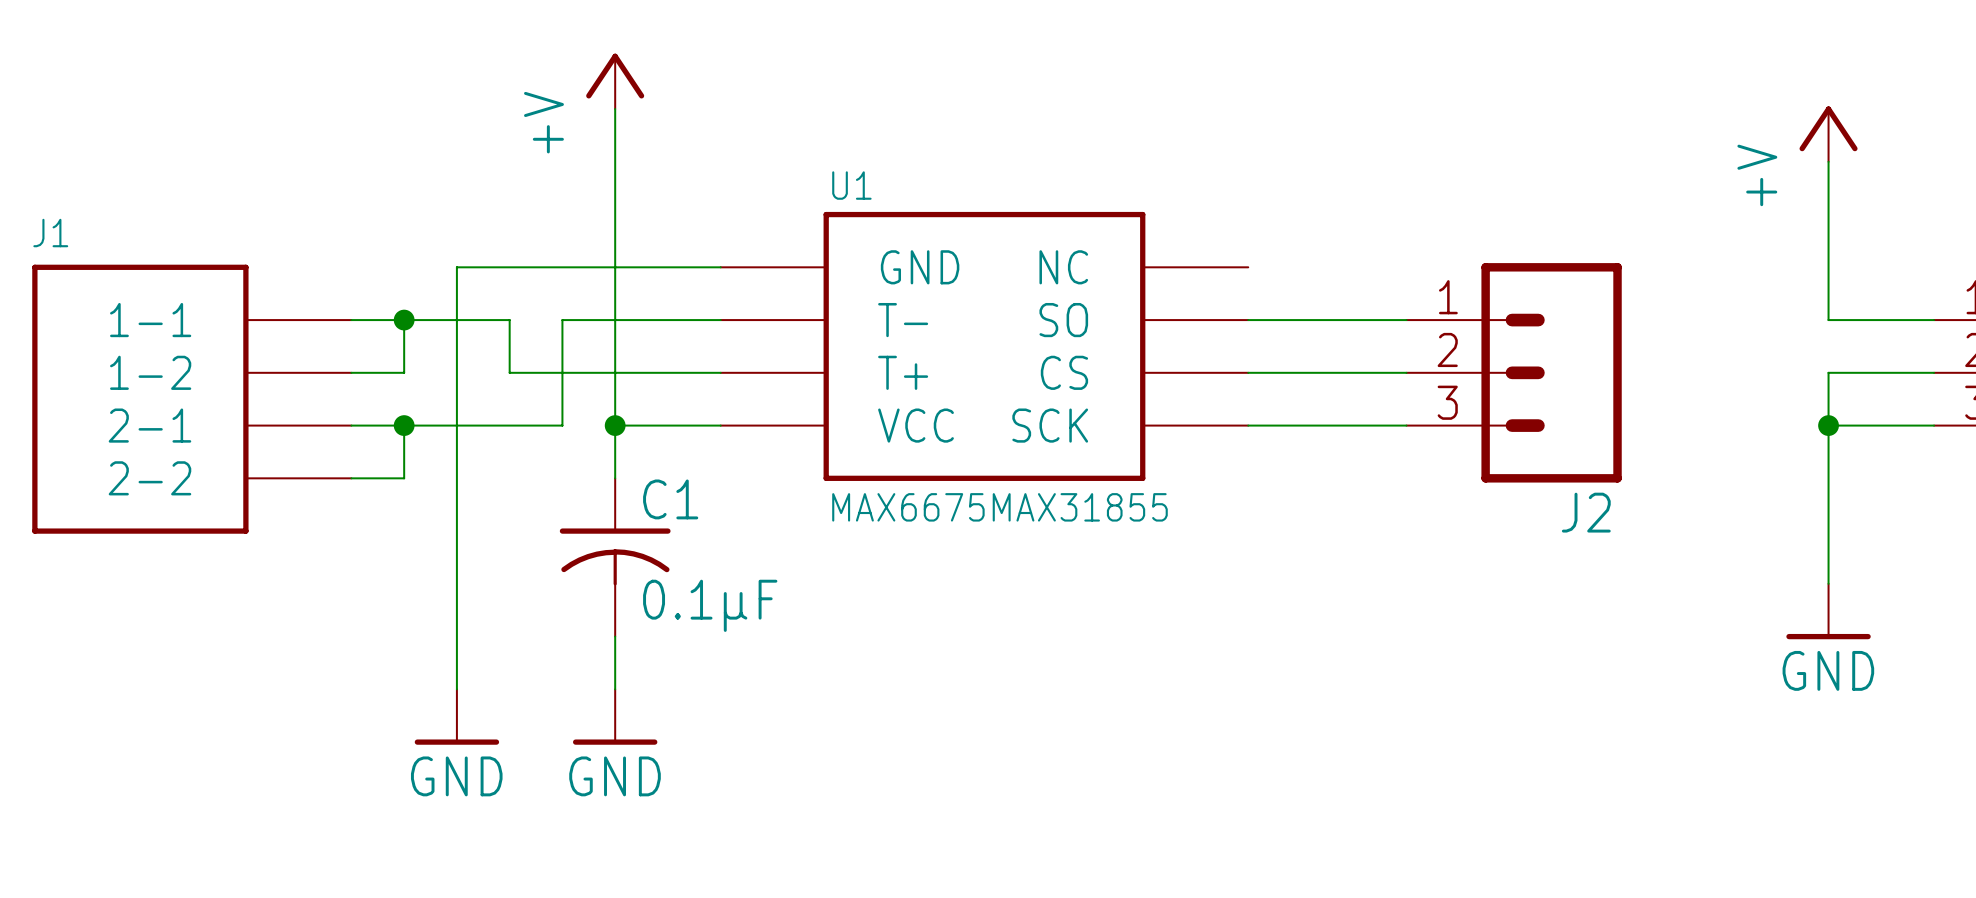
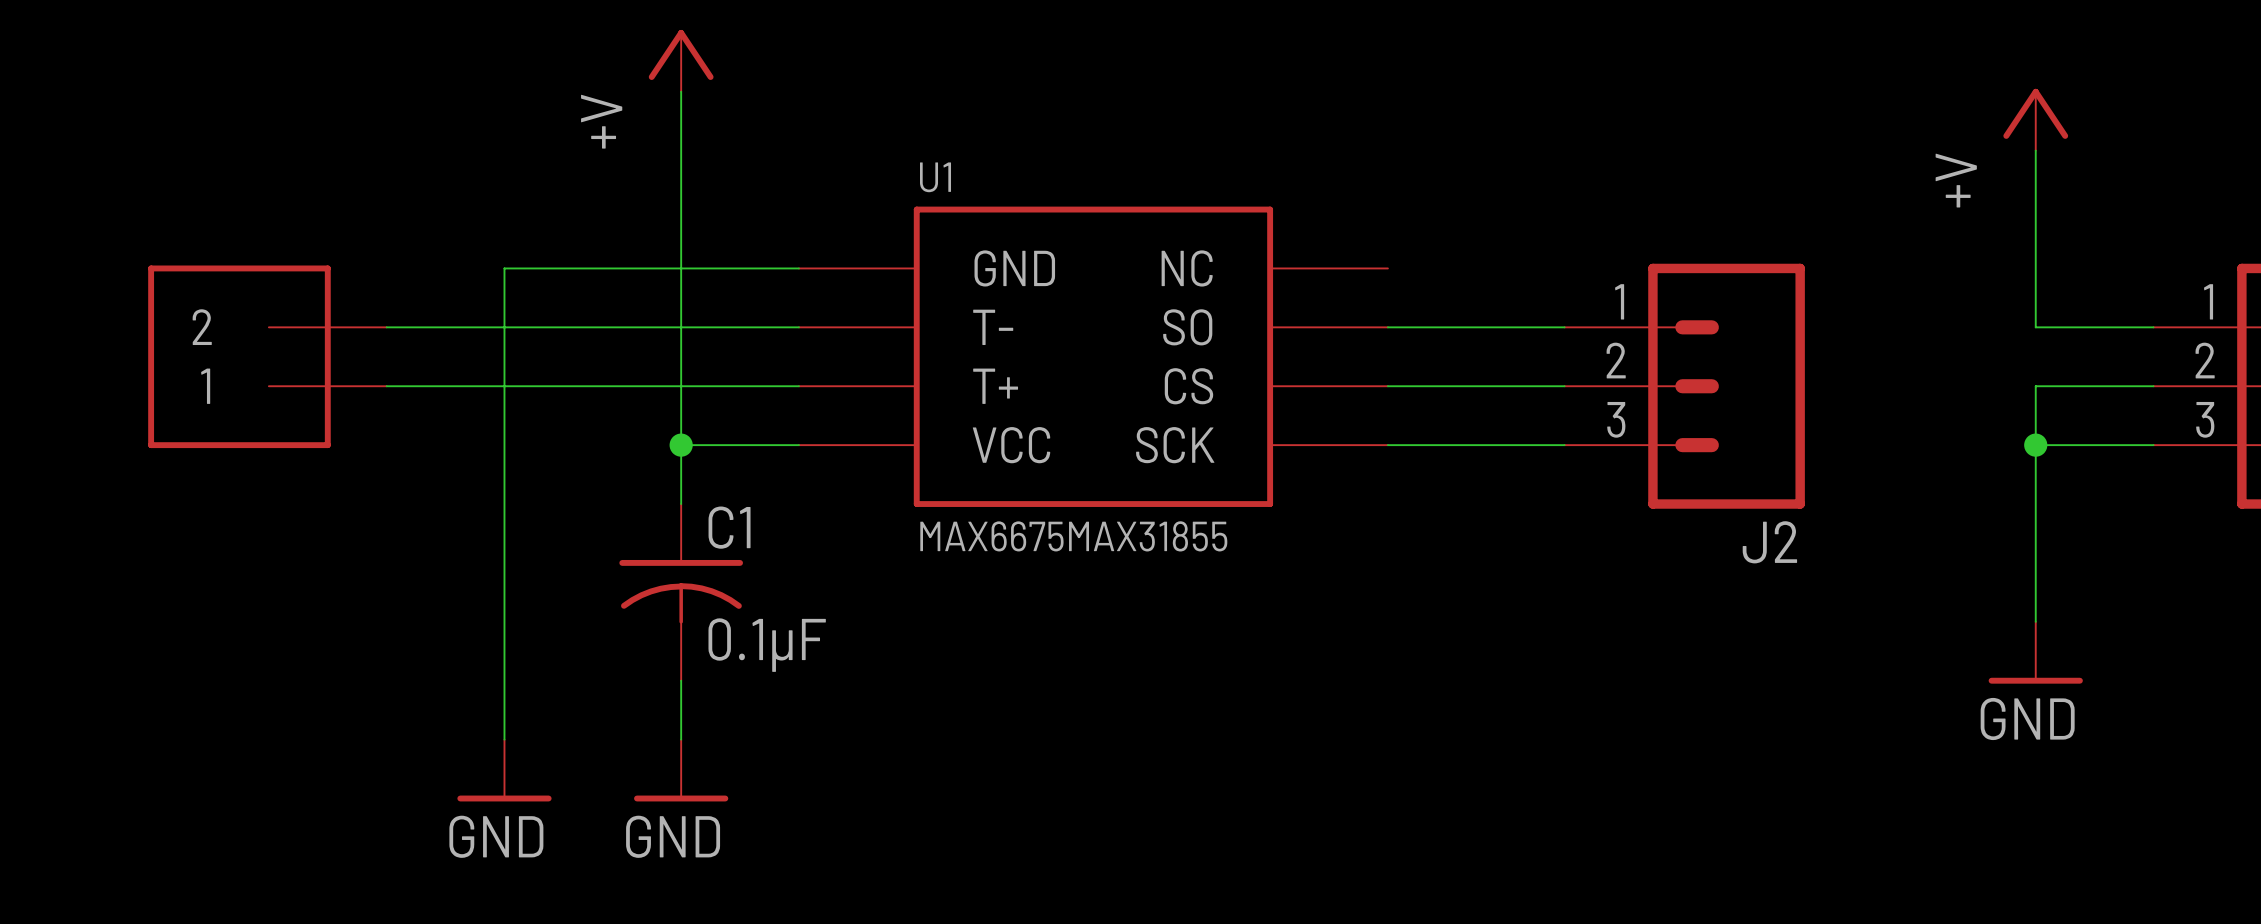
wire: (404, 320) (404, 372) -> (563, 386) (445, 386)
junction: (404, 320) -> none
wire: (509, 320) (509, 372) -> (563, 327) (622, 327)
wire: (562, 320) (562, 425) (351, 425) -> none
part: none -> (267, 356)
J1: (191, 399) -> none
wire: (404, 425) (404, 478) (351, 478) -> none
junction: (404, 425) -> none

